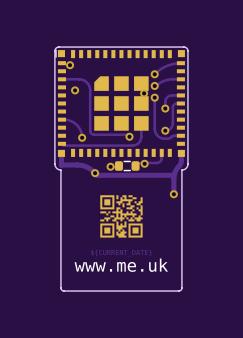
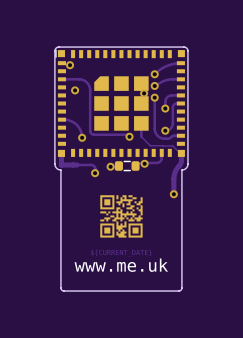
track: (141, 136) (138, 143) (133, 145) (63, 145) (61, 143) -> (141, 136) (150, 145) (172, 145) (180, 153)
track: (77, 165) (88, 167) (97, 175) (173, 175) -> (77, 165) (93, 165) (95, 172)

